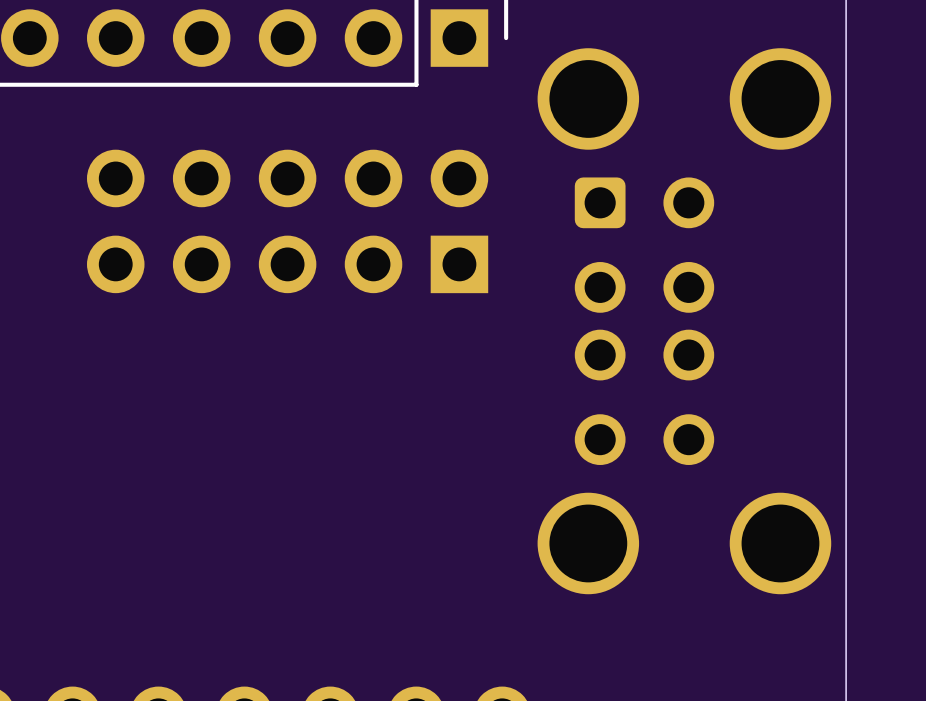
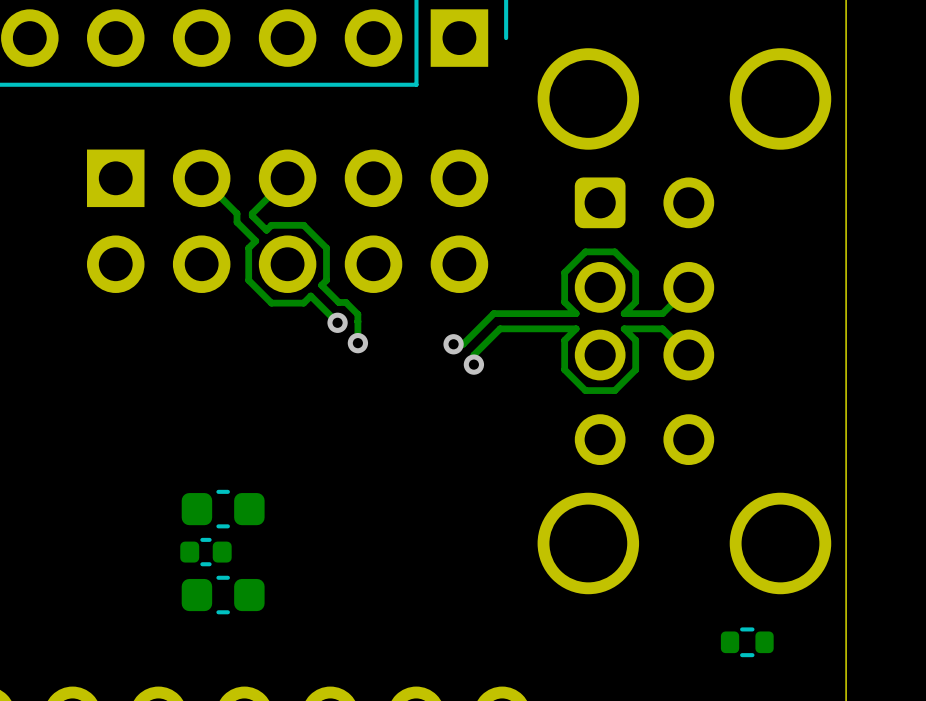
track: none -> (201, 178) (237, 213) (237, 222) (255, 241) (248, 248) (248, 280) (271, 303) (303, 303) (310, 296) (337, 322)
track: none -> (287, 178) (252, 213) (252, 215) (266, 230) (271, 225) (303, 225) (326, 248) (326, 280) (321, 285) (338, 302) (345, 302) (357, 314) (357, 343)
part rotation: 0° (287, 221) -> 180° (287, 221)
track: none -> (688, 287) (662, 313) (624, 313) (635, 302) (635, 272) (614, 251) (585, 251) (564, 272) (564, 302) (576, 313) (493, 313) (463, 344) (453, 344)
via: none -> (337, 322)
via: none -> (357, 343)
via: none -> (453, 344)
track: none -> (688, 355) (662, 328) (624, 328) (635, 340) (635, 369) (614, 390) (585, 390) (564, 369) (564, 340) (576, 328) (500, 328) (473, 355) (473, 364)
via: none -> (473, 364)
part: none -> (223, 509)
part: none -> (205, 552)
part: none -> (223, 595)
part: none -> (747, 642)

